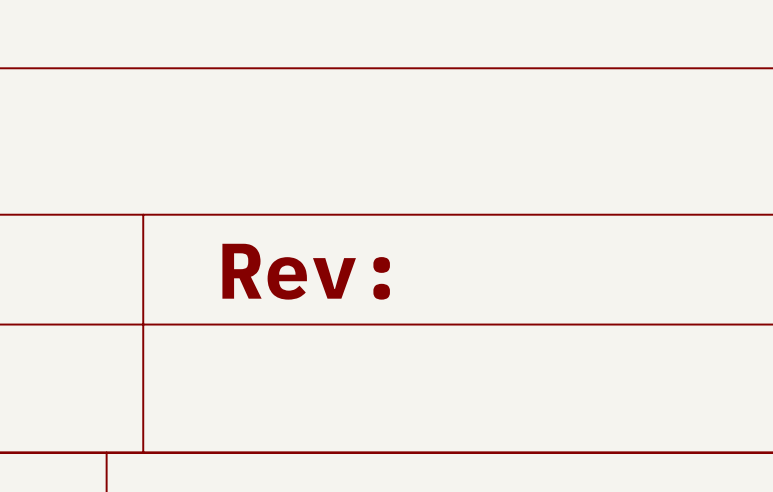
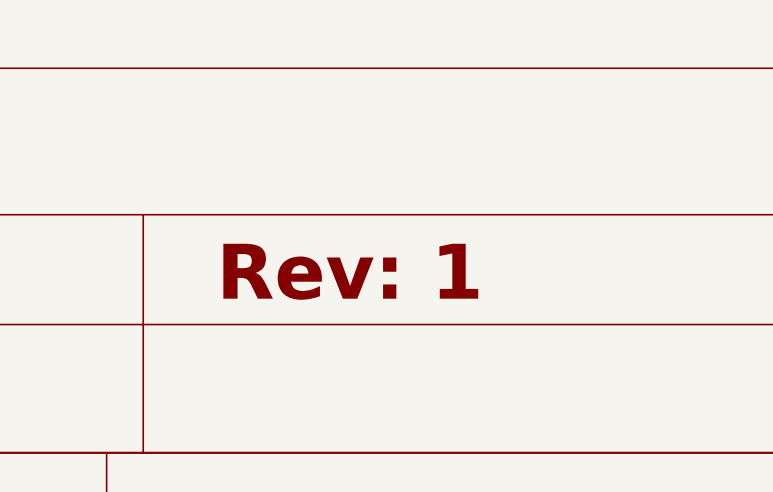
title block: Rev: (306, 271) -> Rev: 1 (350, 271)

